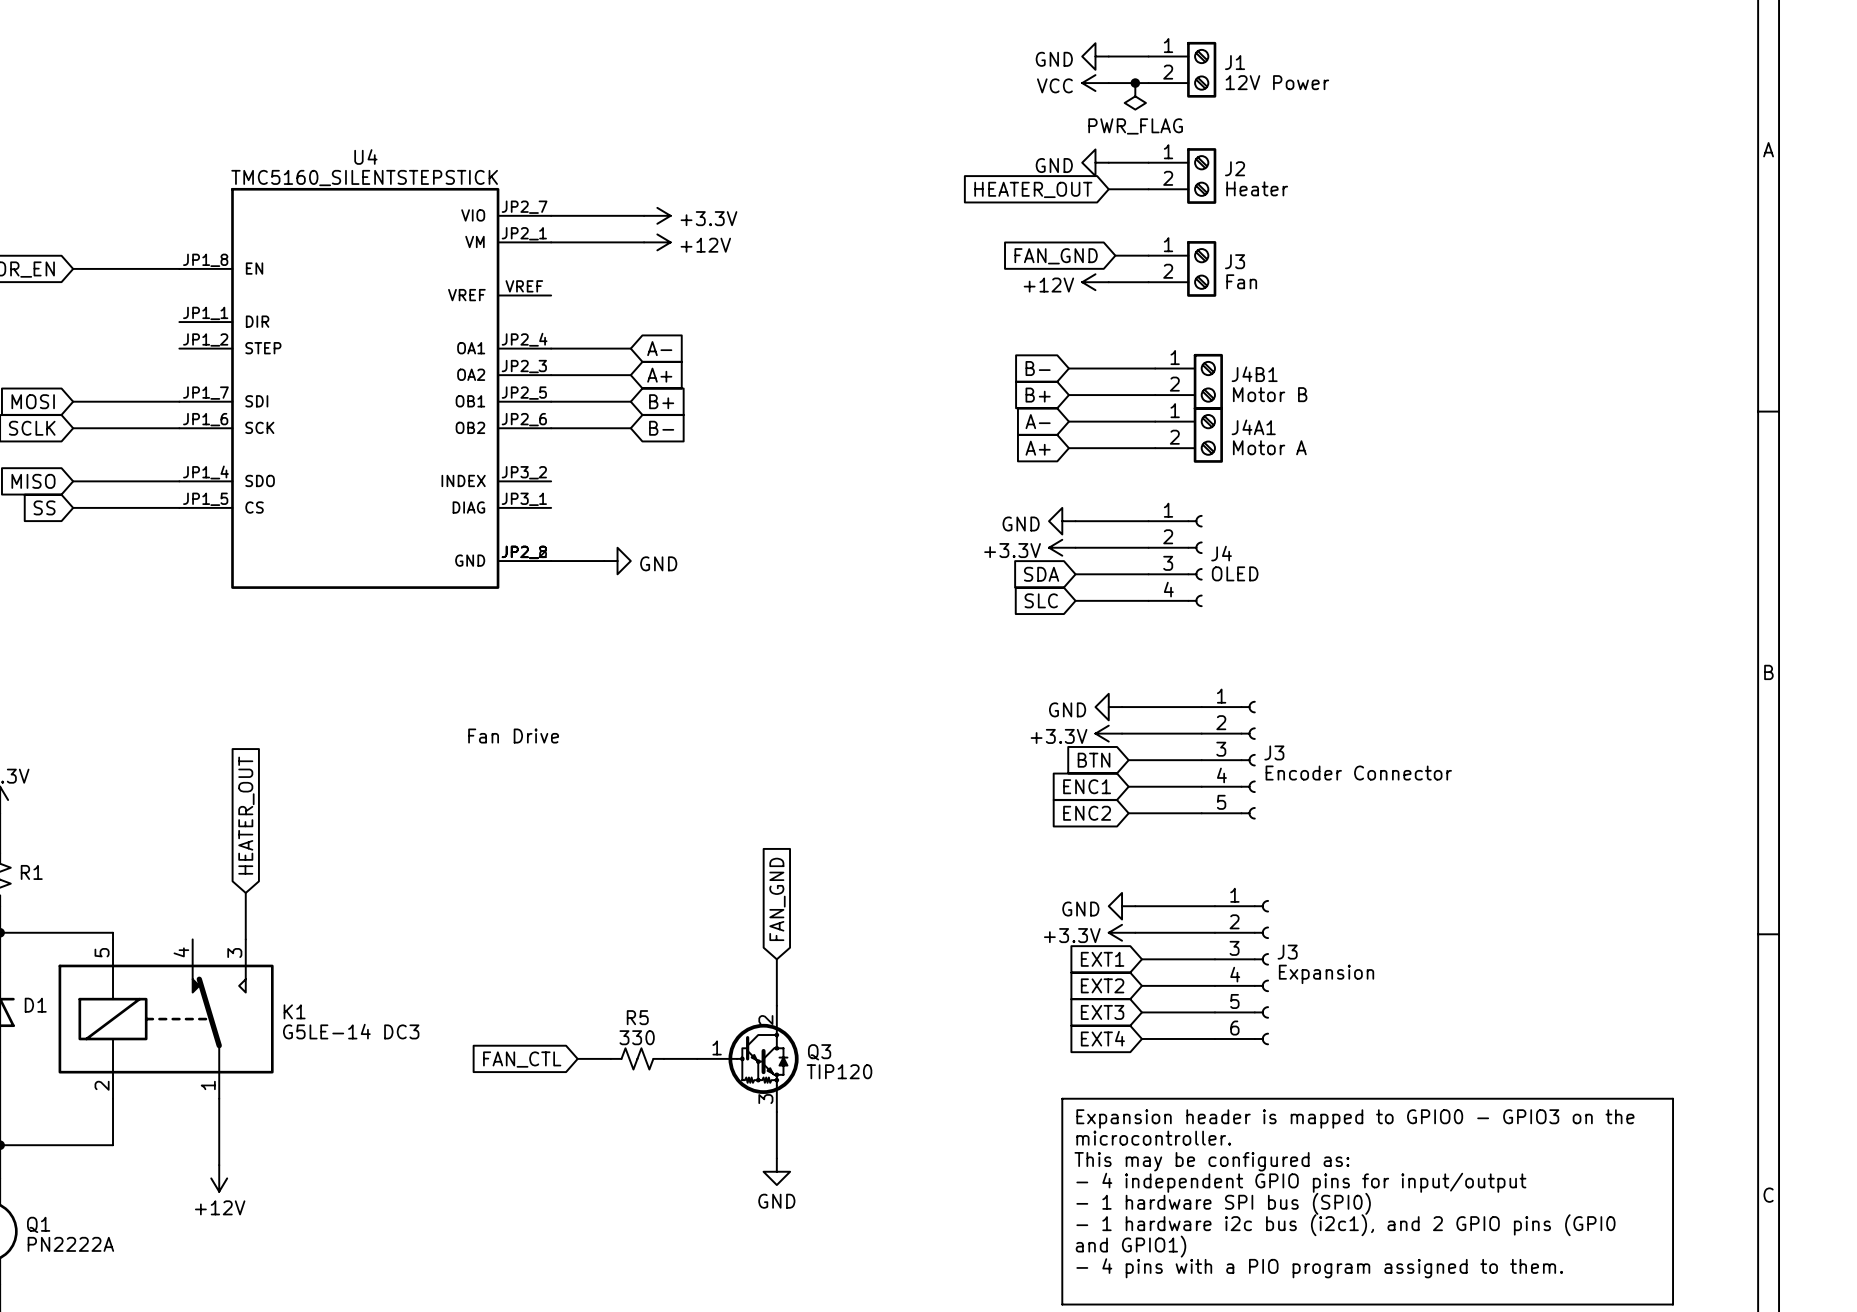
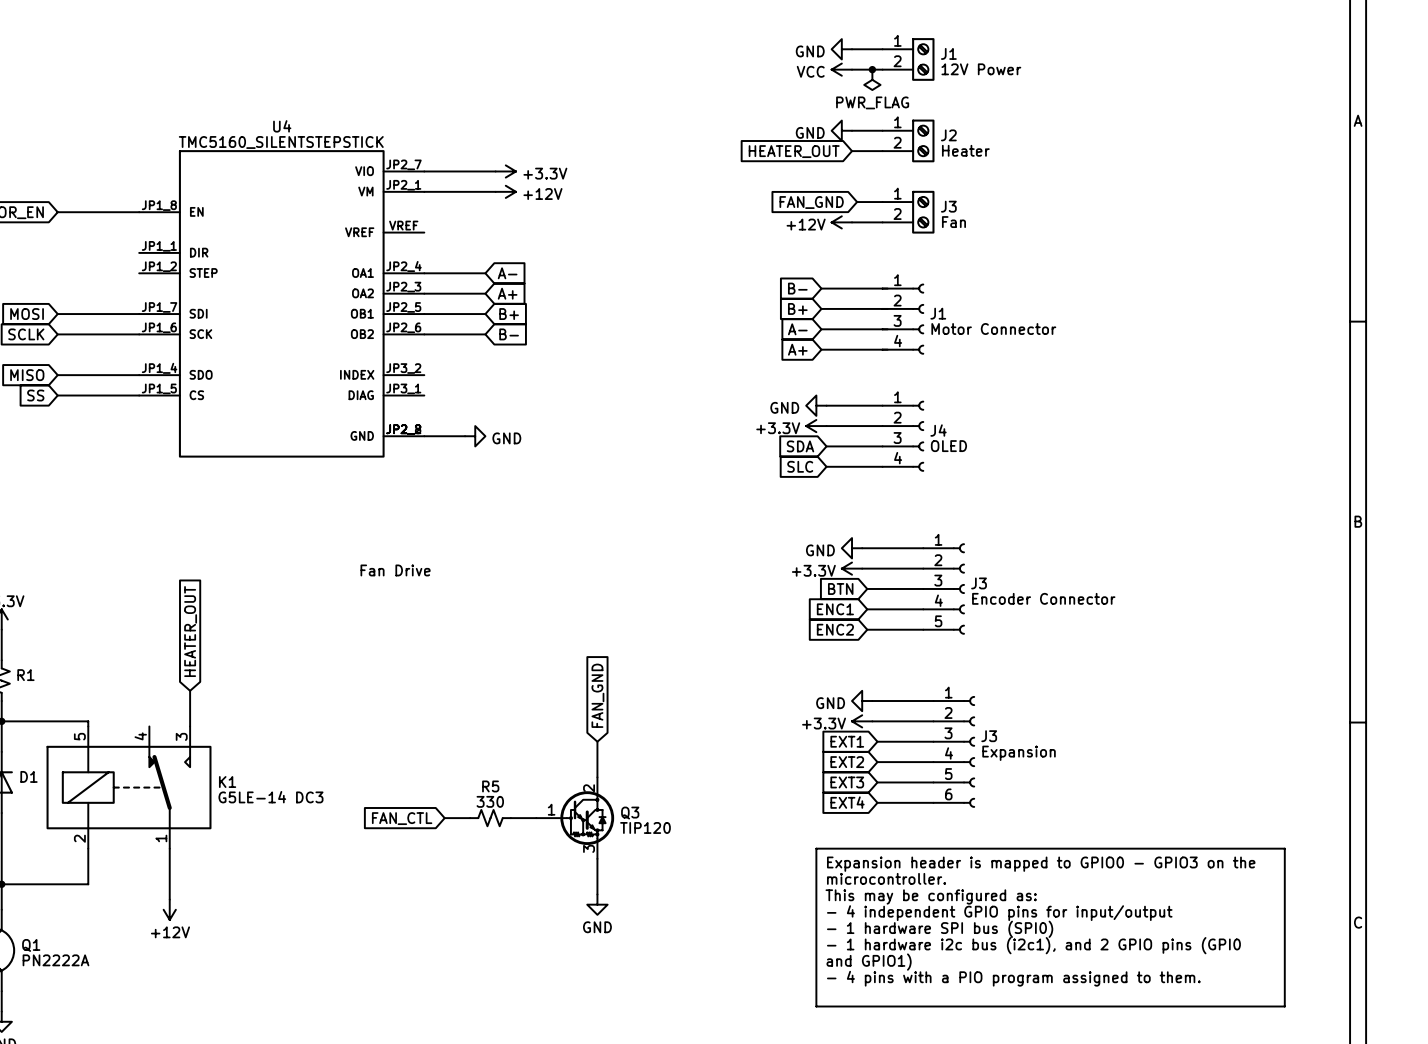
J4B1: Motor B (1189, 381) -> none
J1: none -> Motor Connector (903, 319)
J4A1: Motor A (1189, 434) -> none

